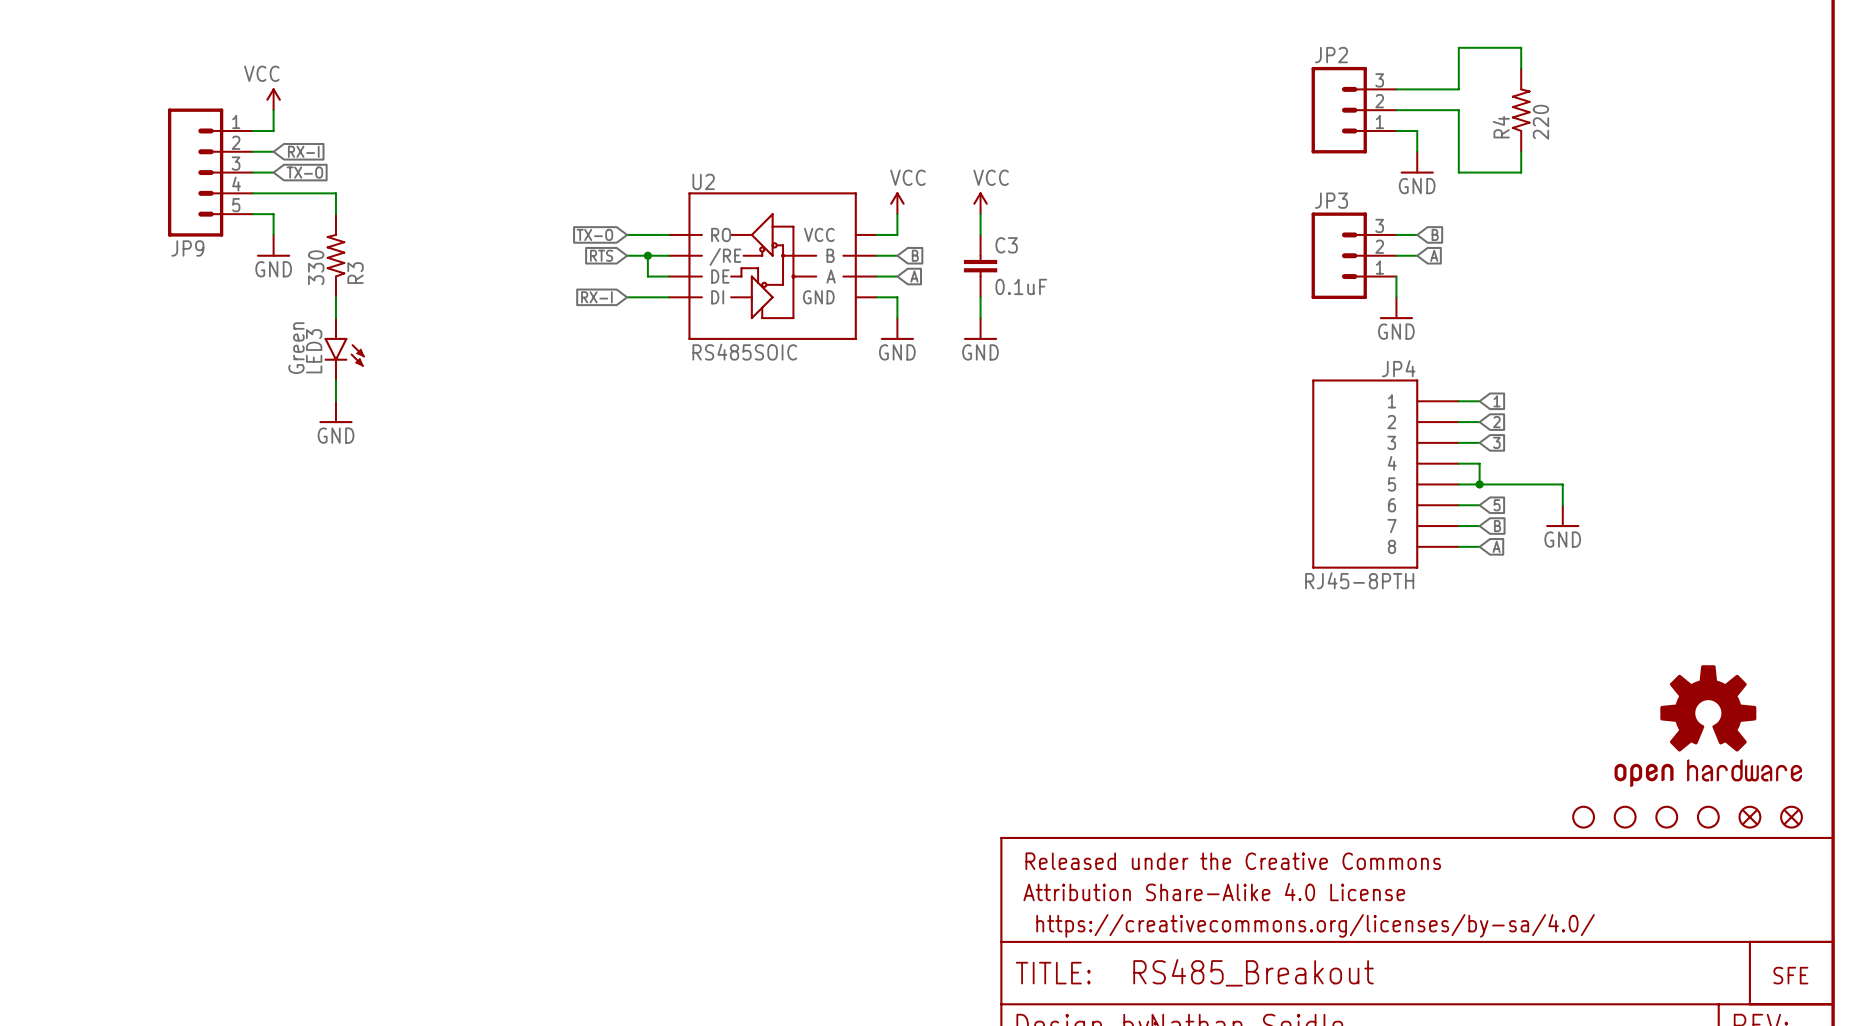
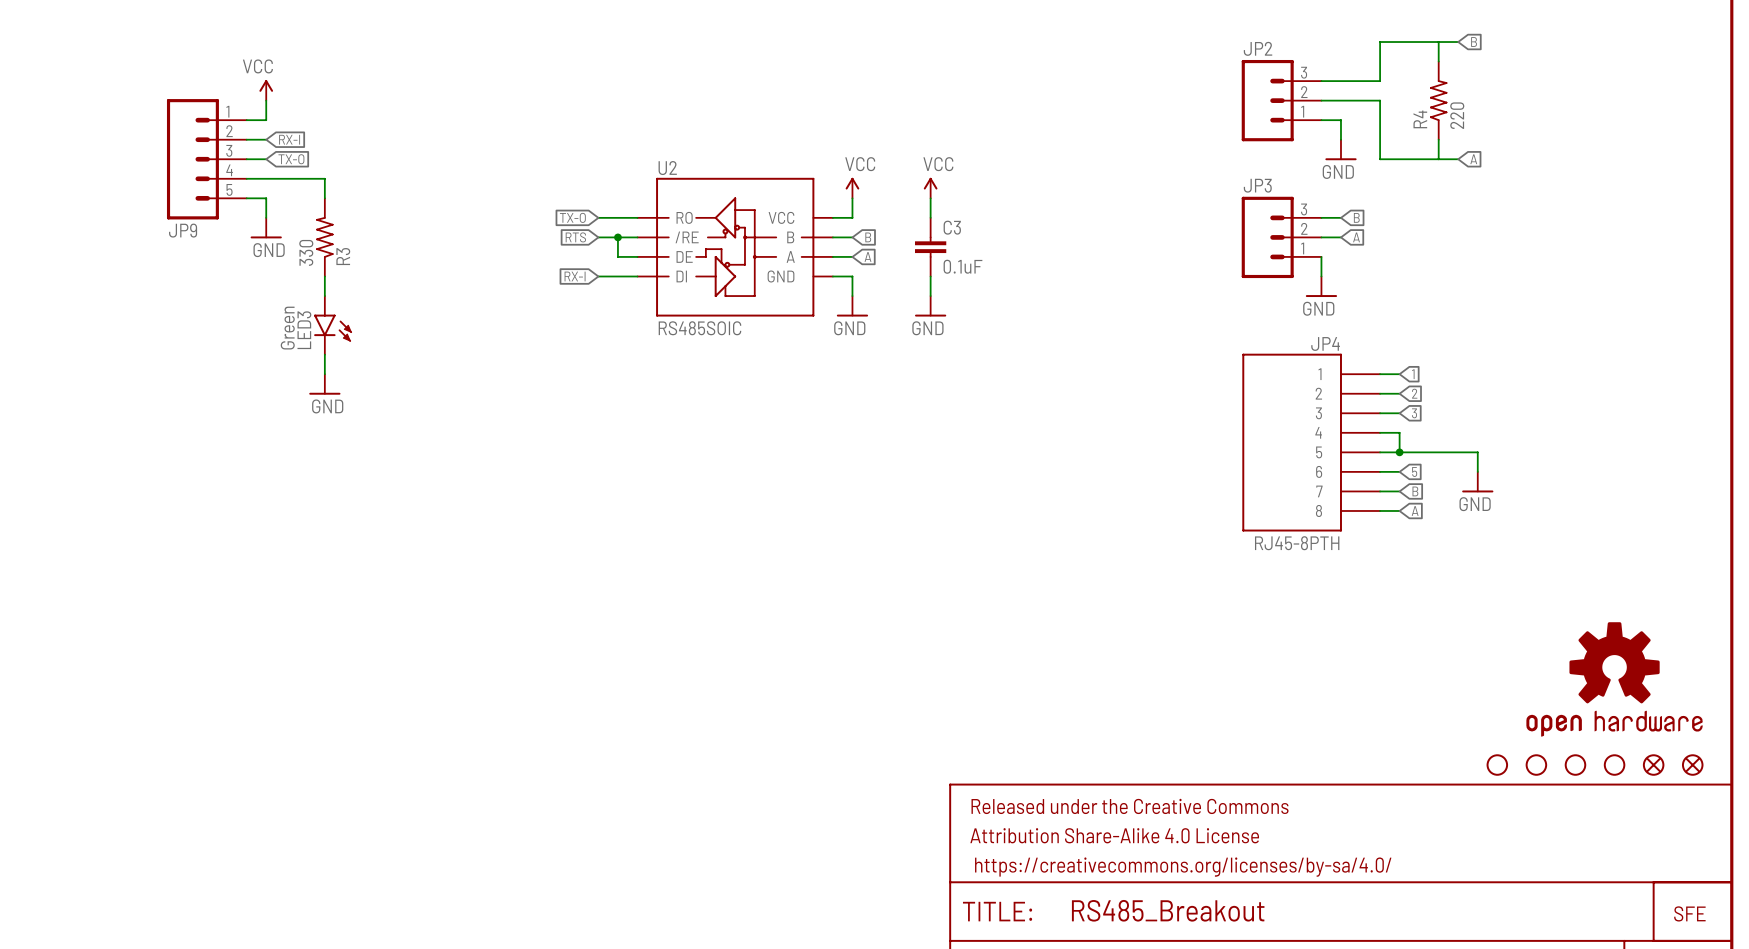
wire: none -> (1438, 42) (1458, 42)
global label: none -> B (1474, 42)
wire: none -> (1438, 159) (1458, 159)
global label: none -> A (1473, 159)

